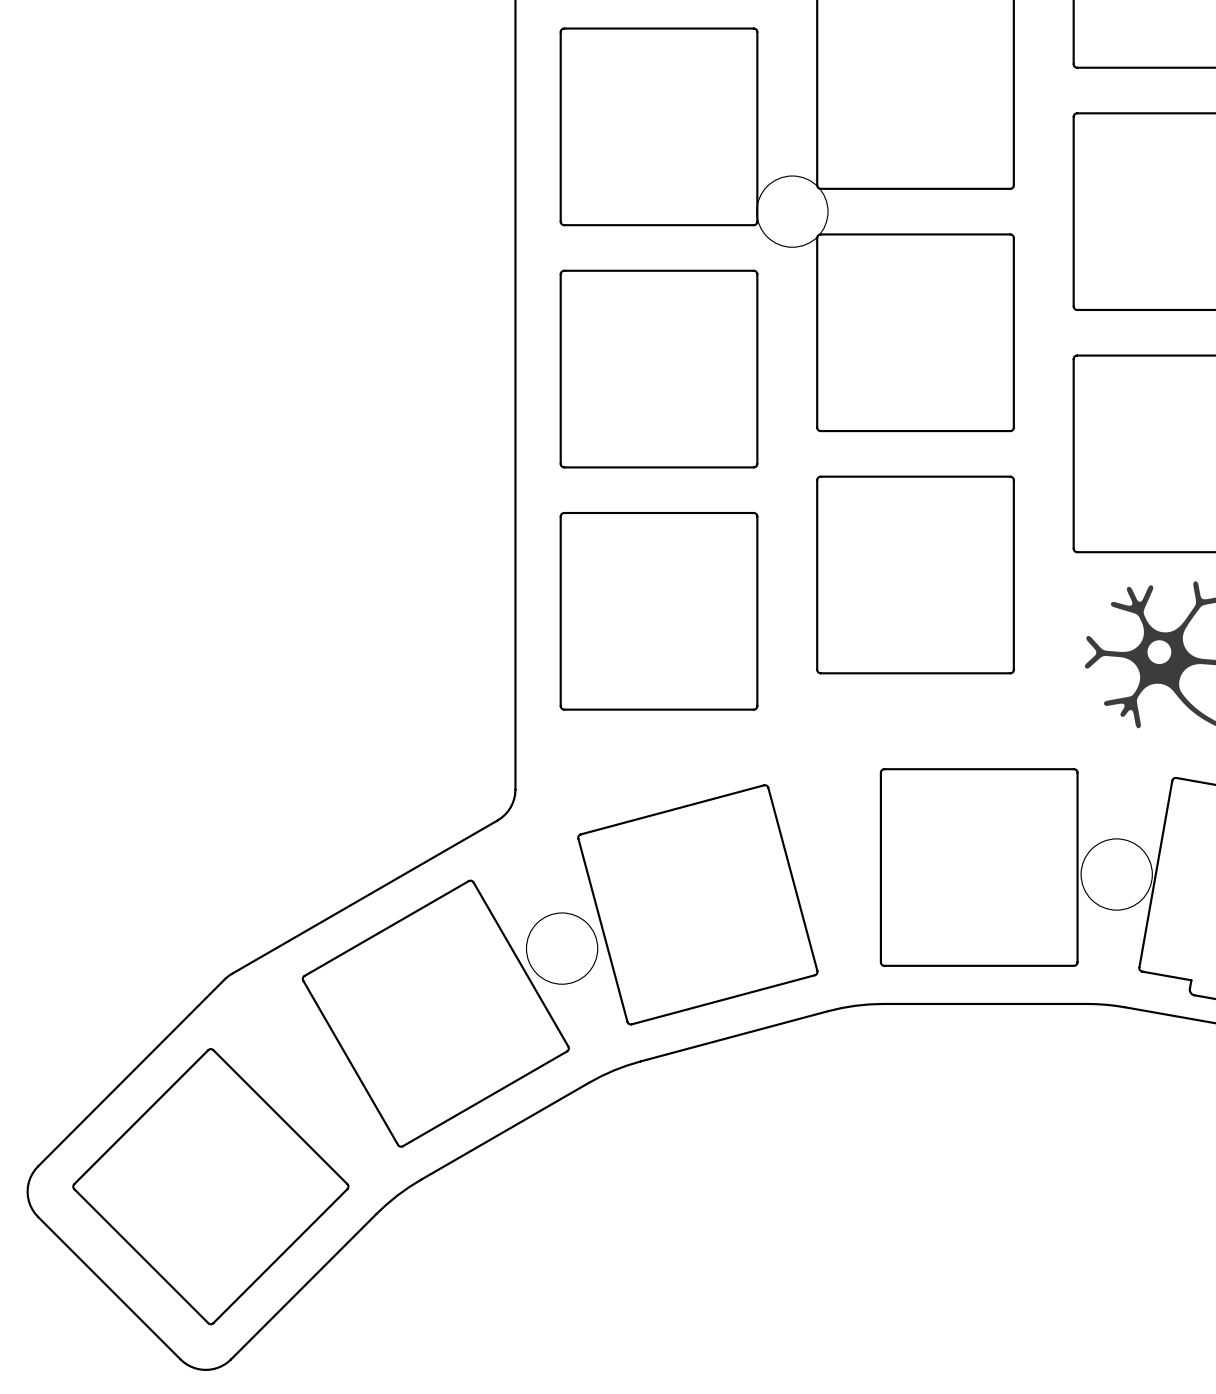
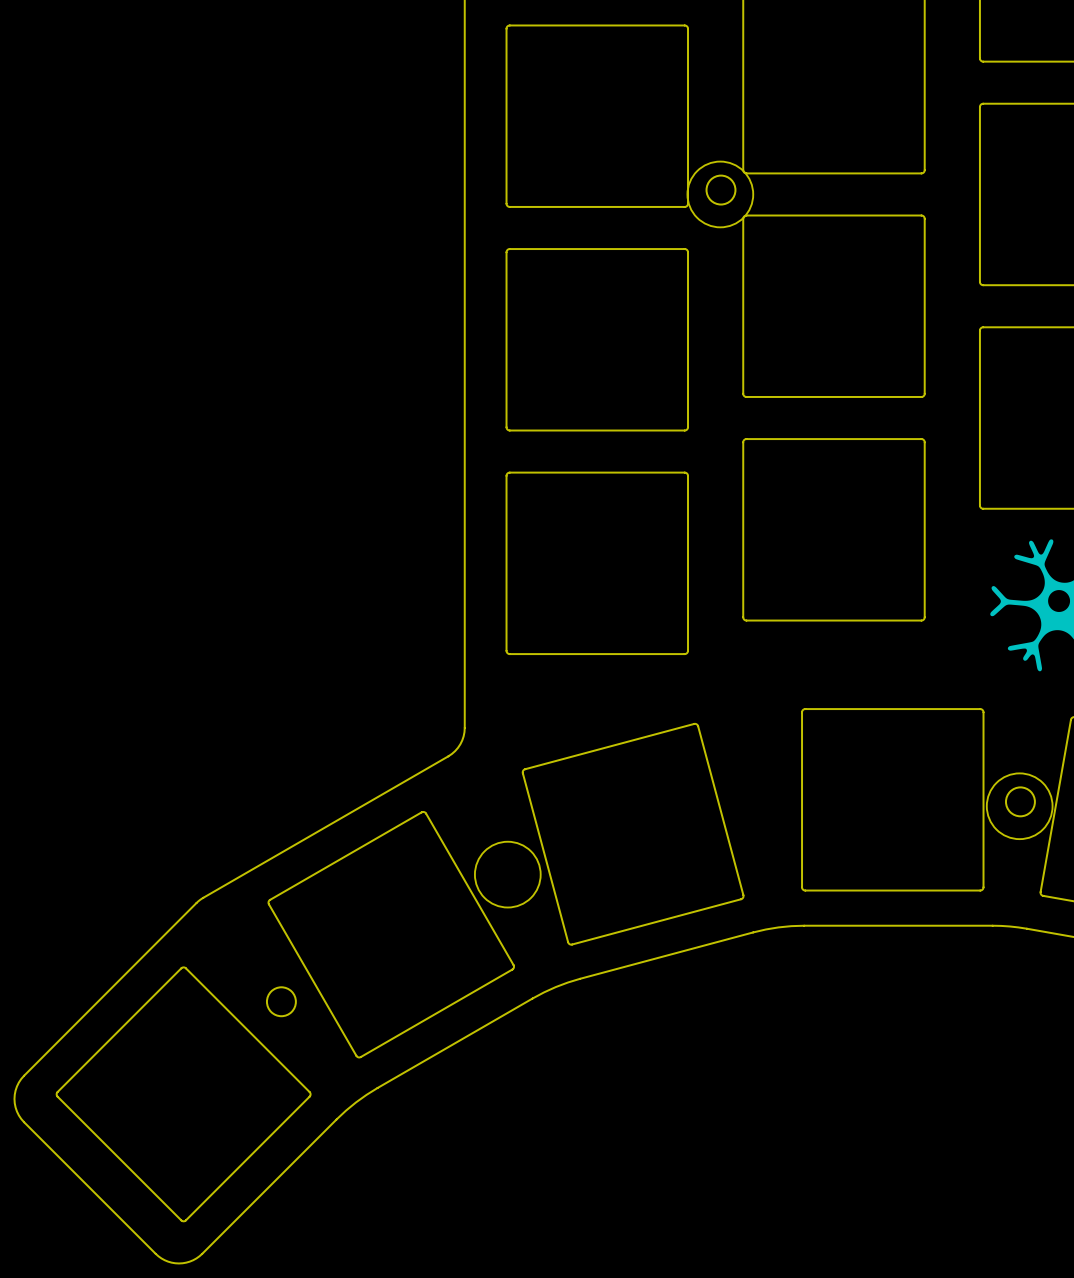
round board edge: none -> [705, 174, 737, 206]
round board edge: none -> [1005, 786, 1036, 818]
round board edge: none -> [265, 986, 297, 1018]

